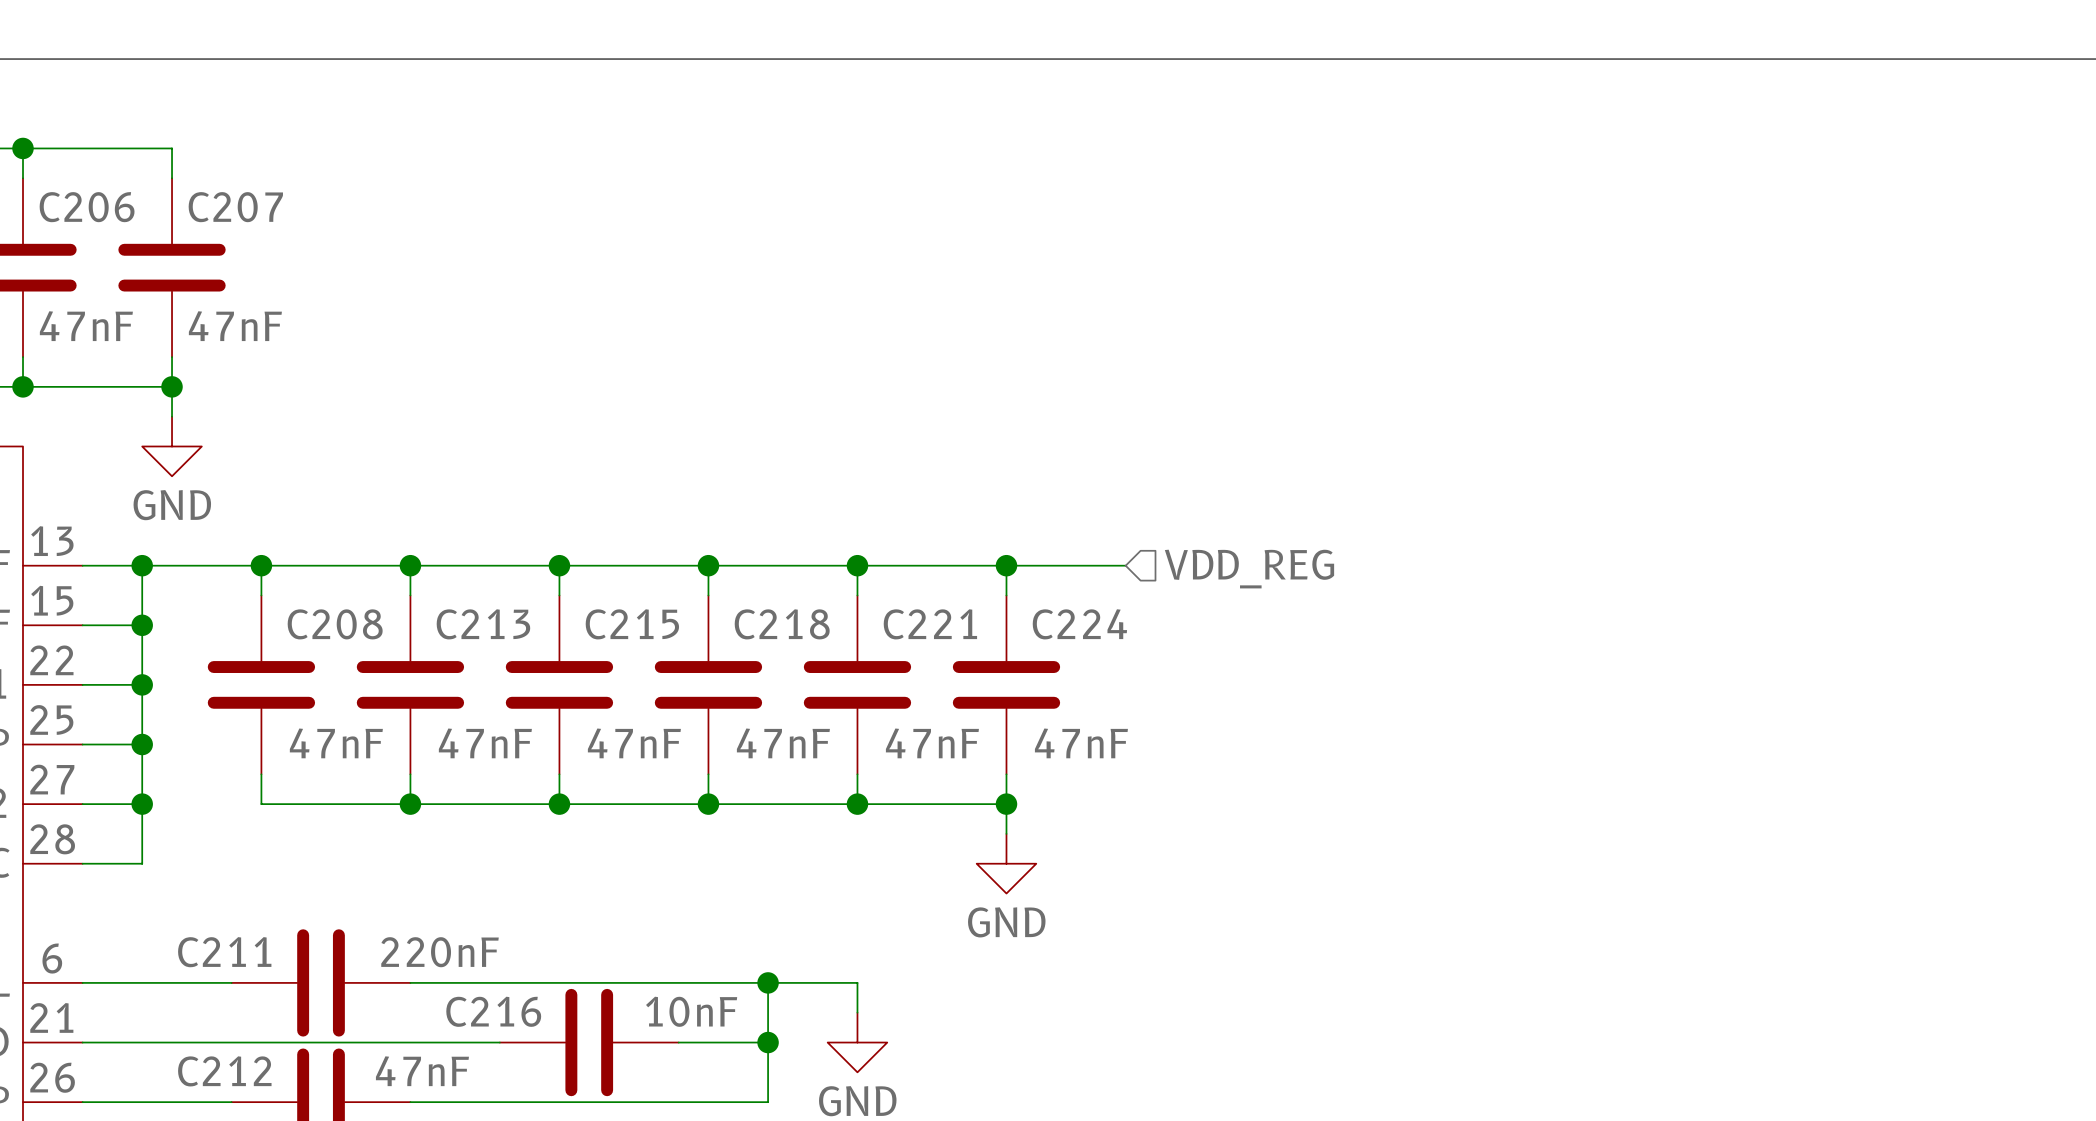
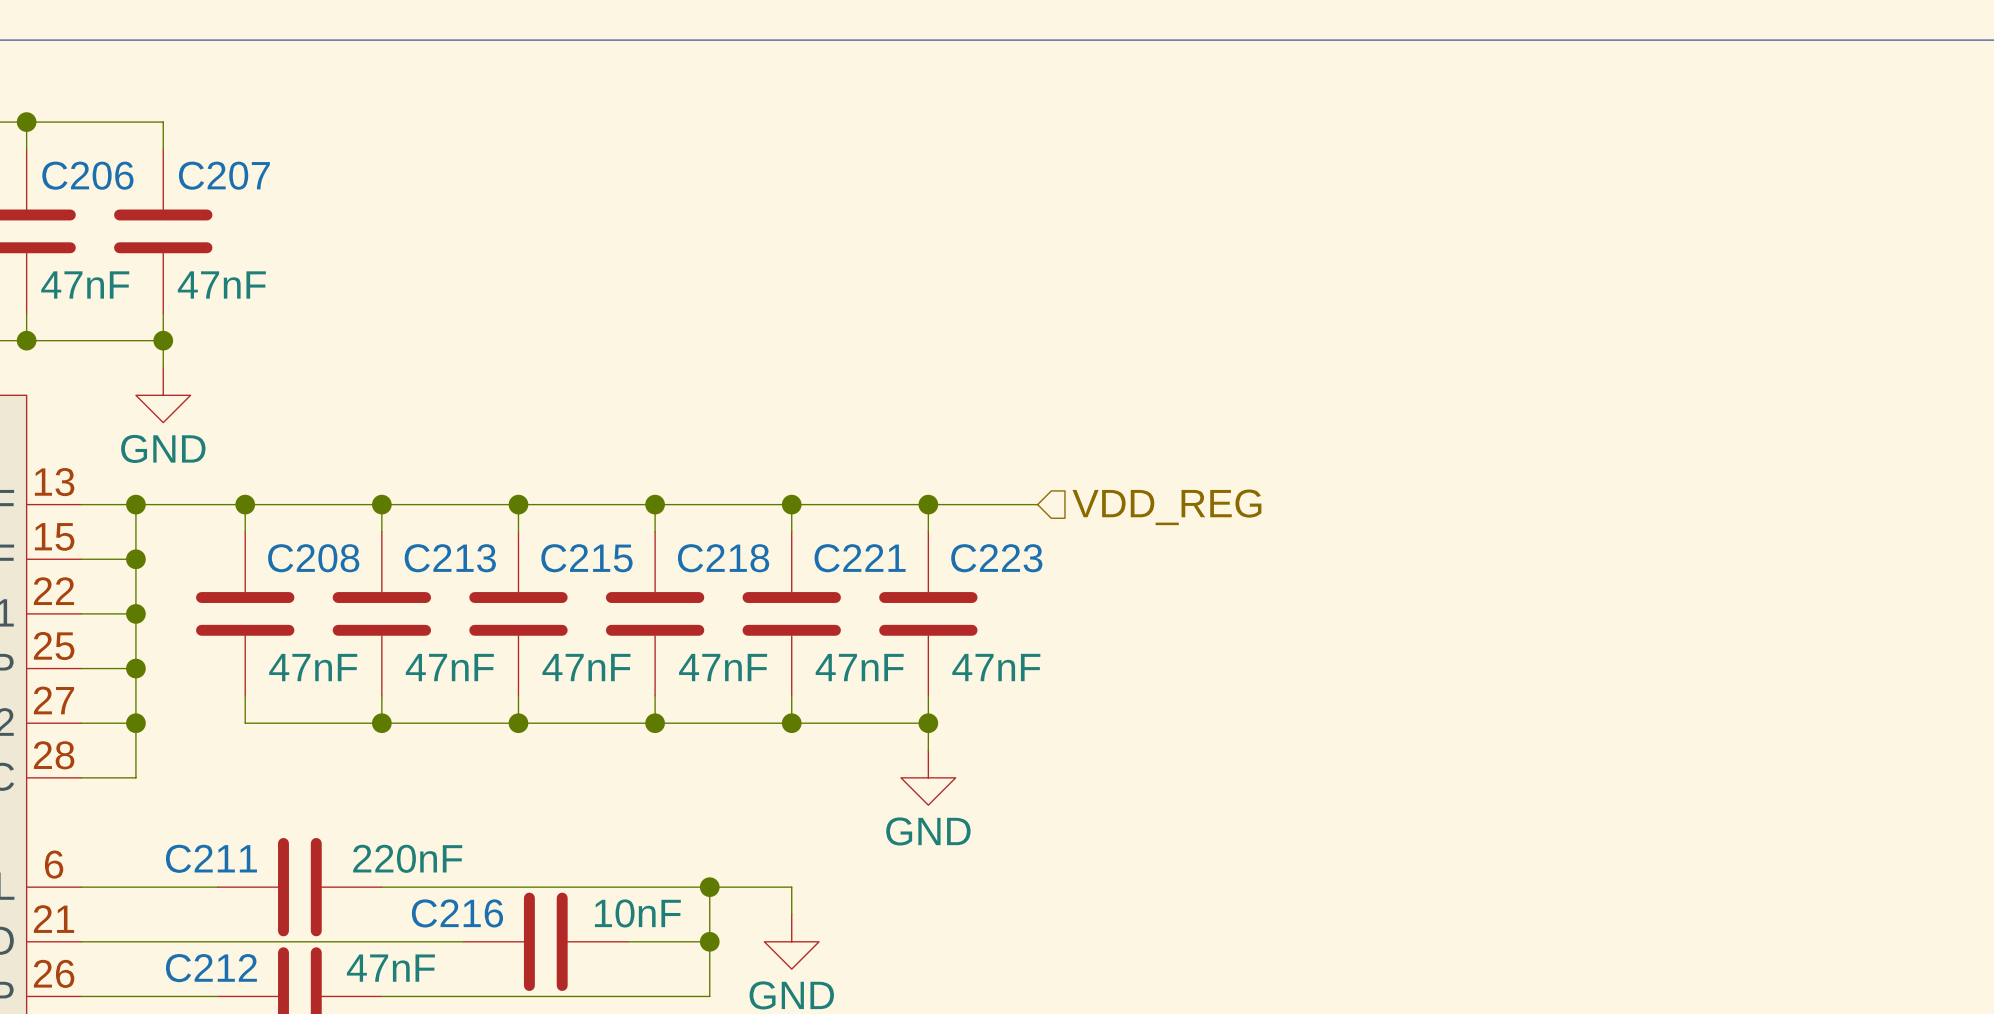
C224 name: C224 (1079, 624) -> C223 (996, 558)

